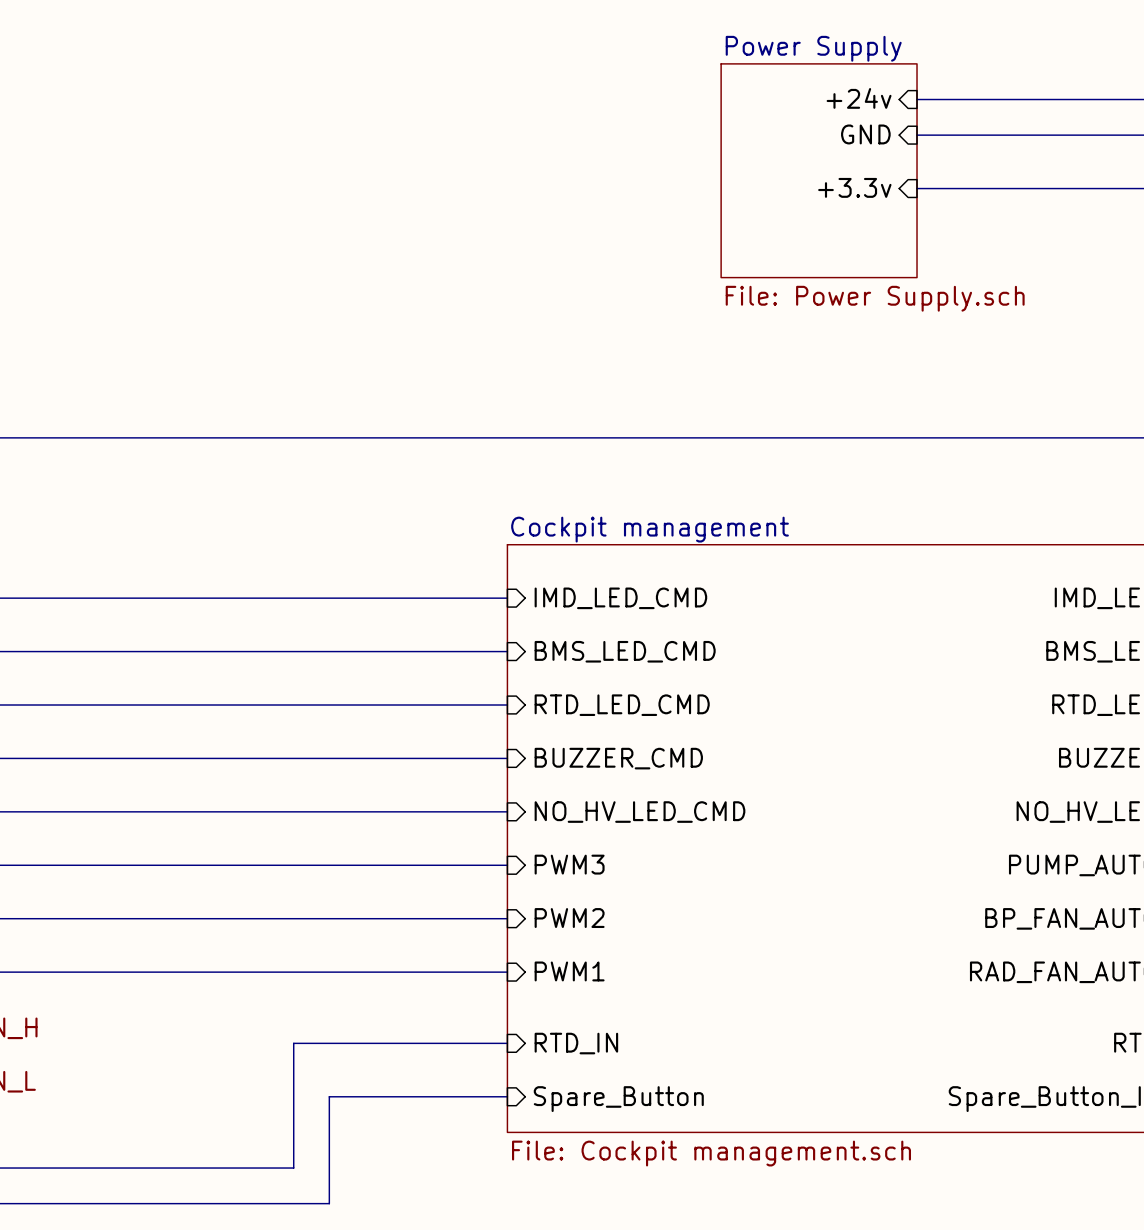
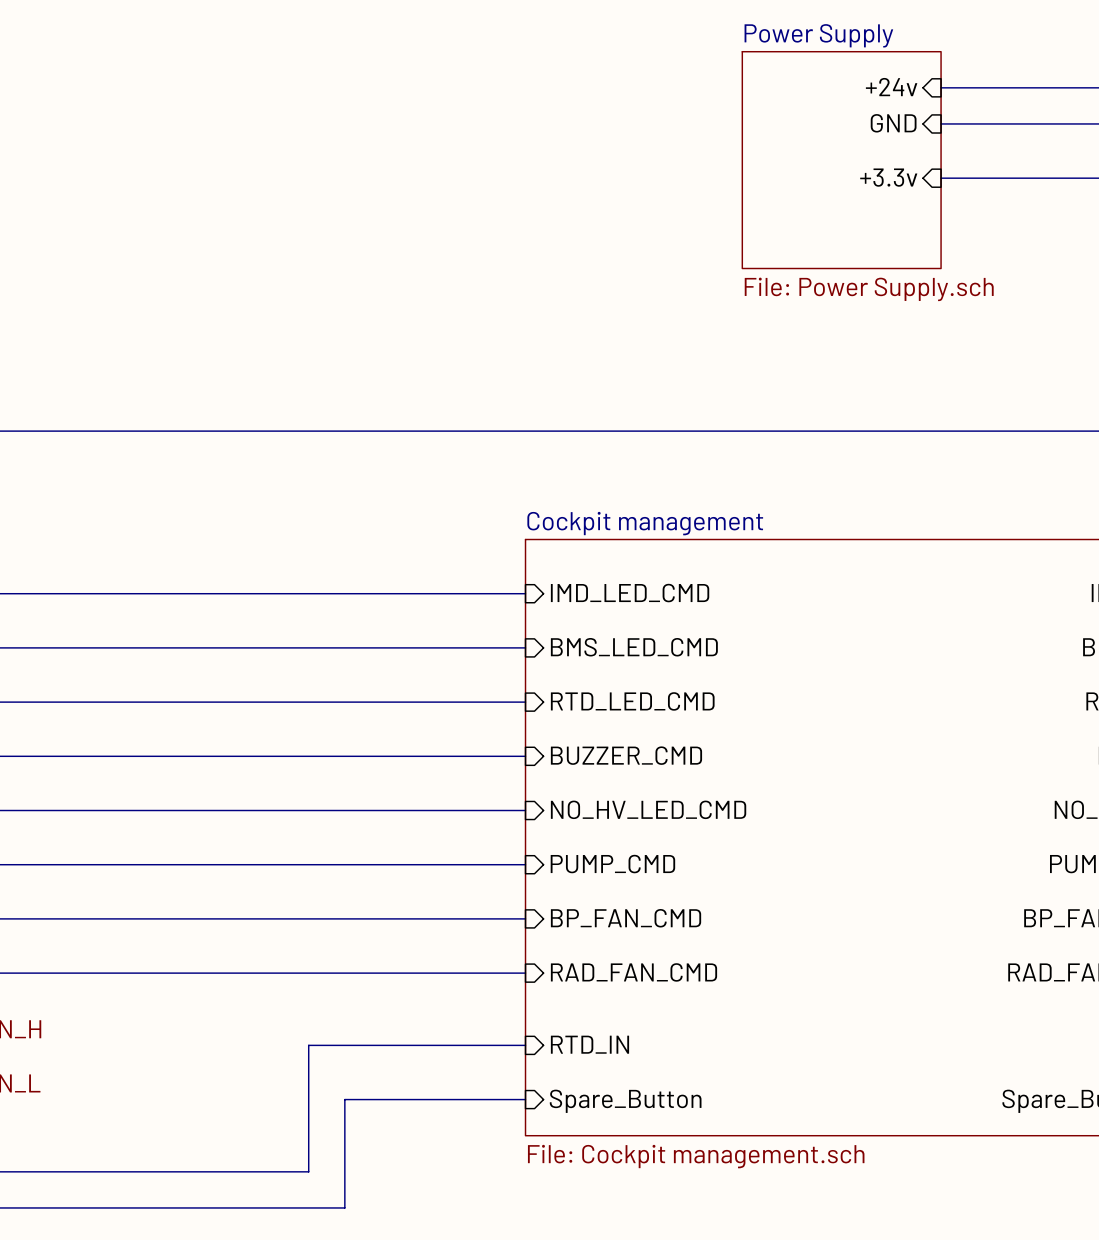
sheet pin: PWM3 (569, 864) -> PUMP_CMD (612, 864)
sheet pin: PWM2 (569, 918) -> BP_FAN_CMD (626, 918)
sheet pin: PWM1 (569, 971) -> RAD_FAN_CMD (633, 972)

